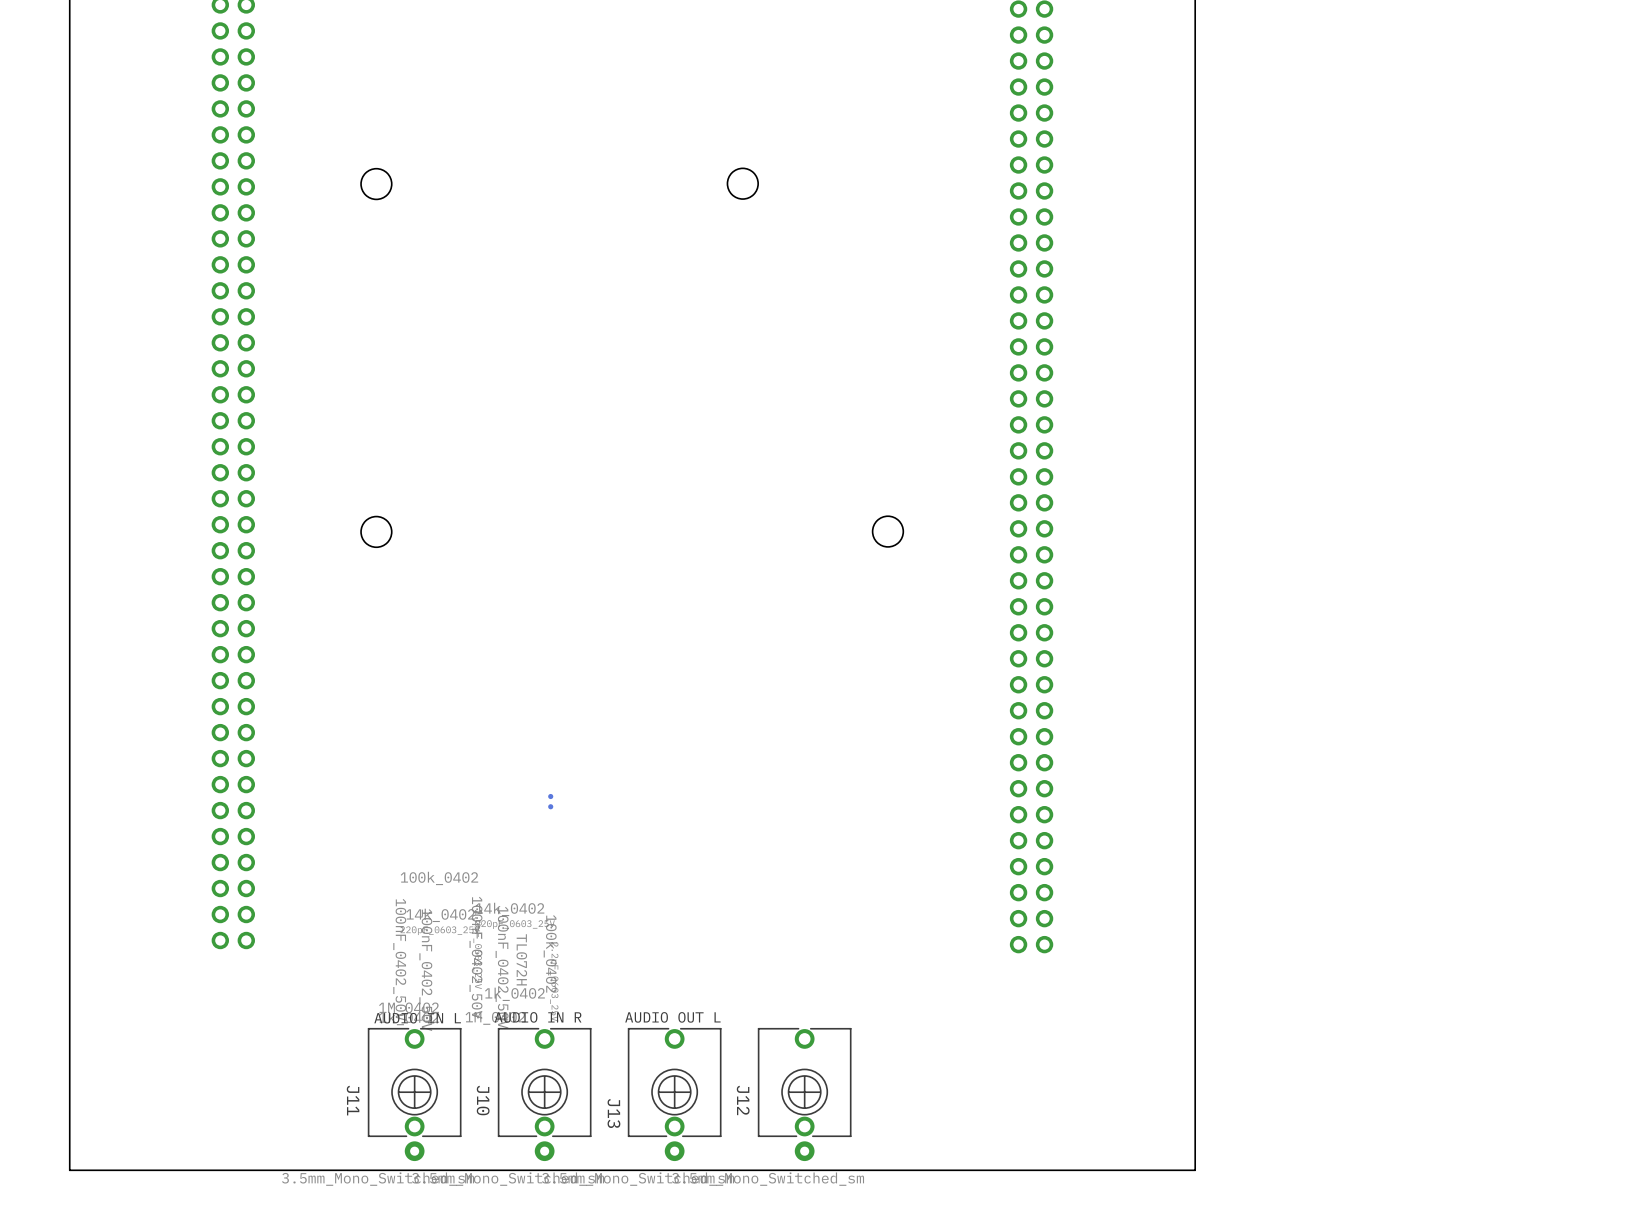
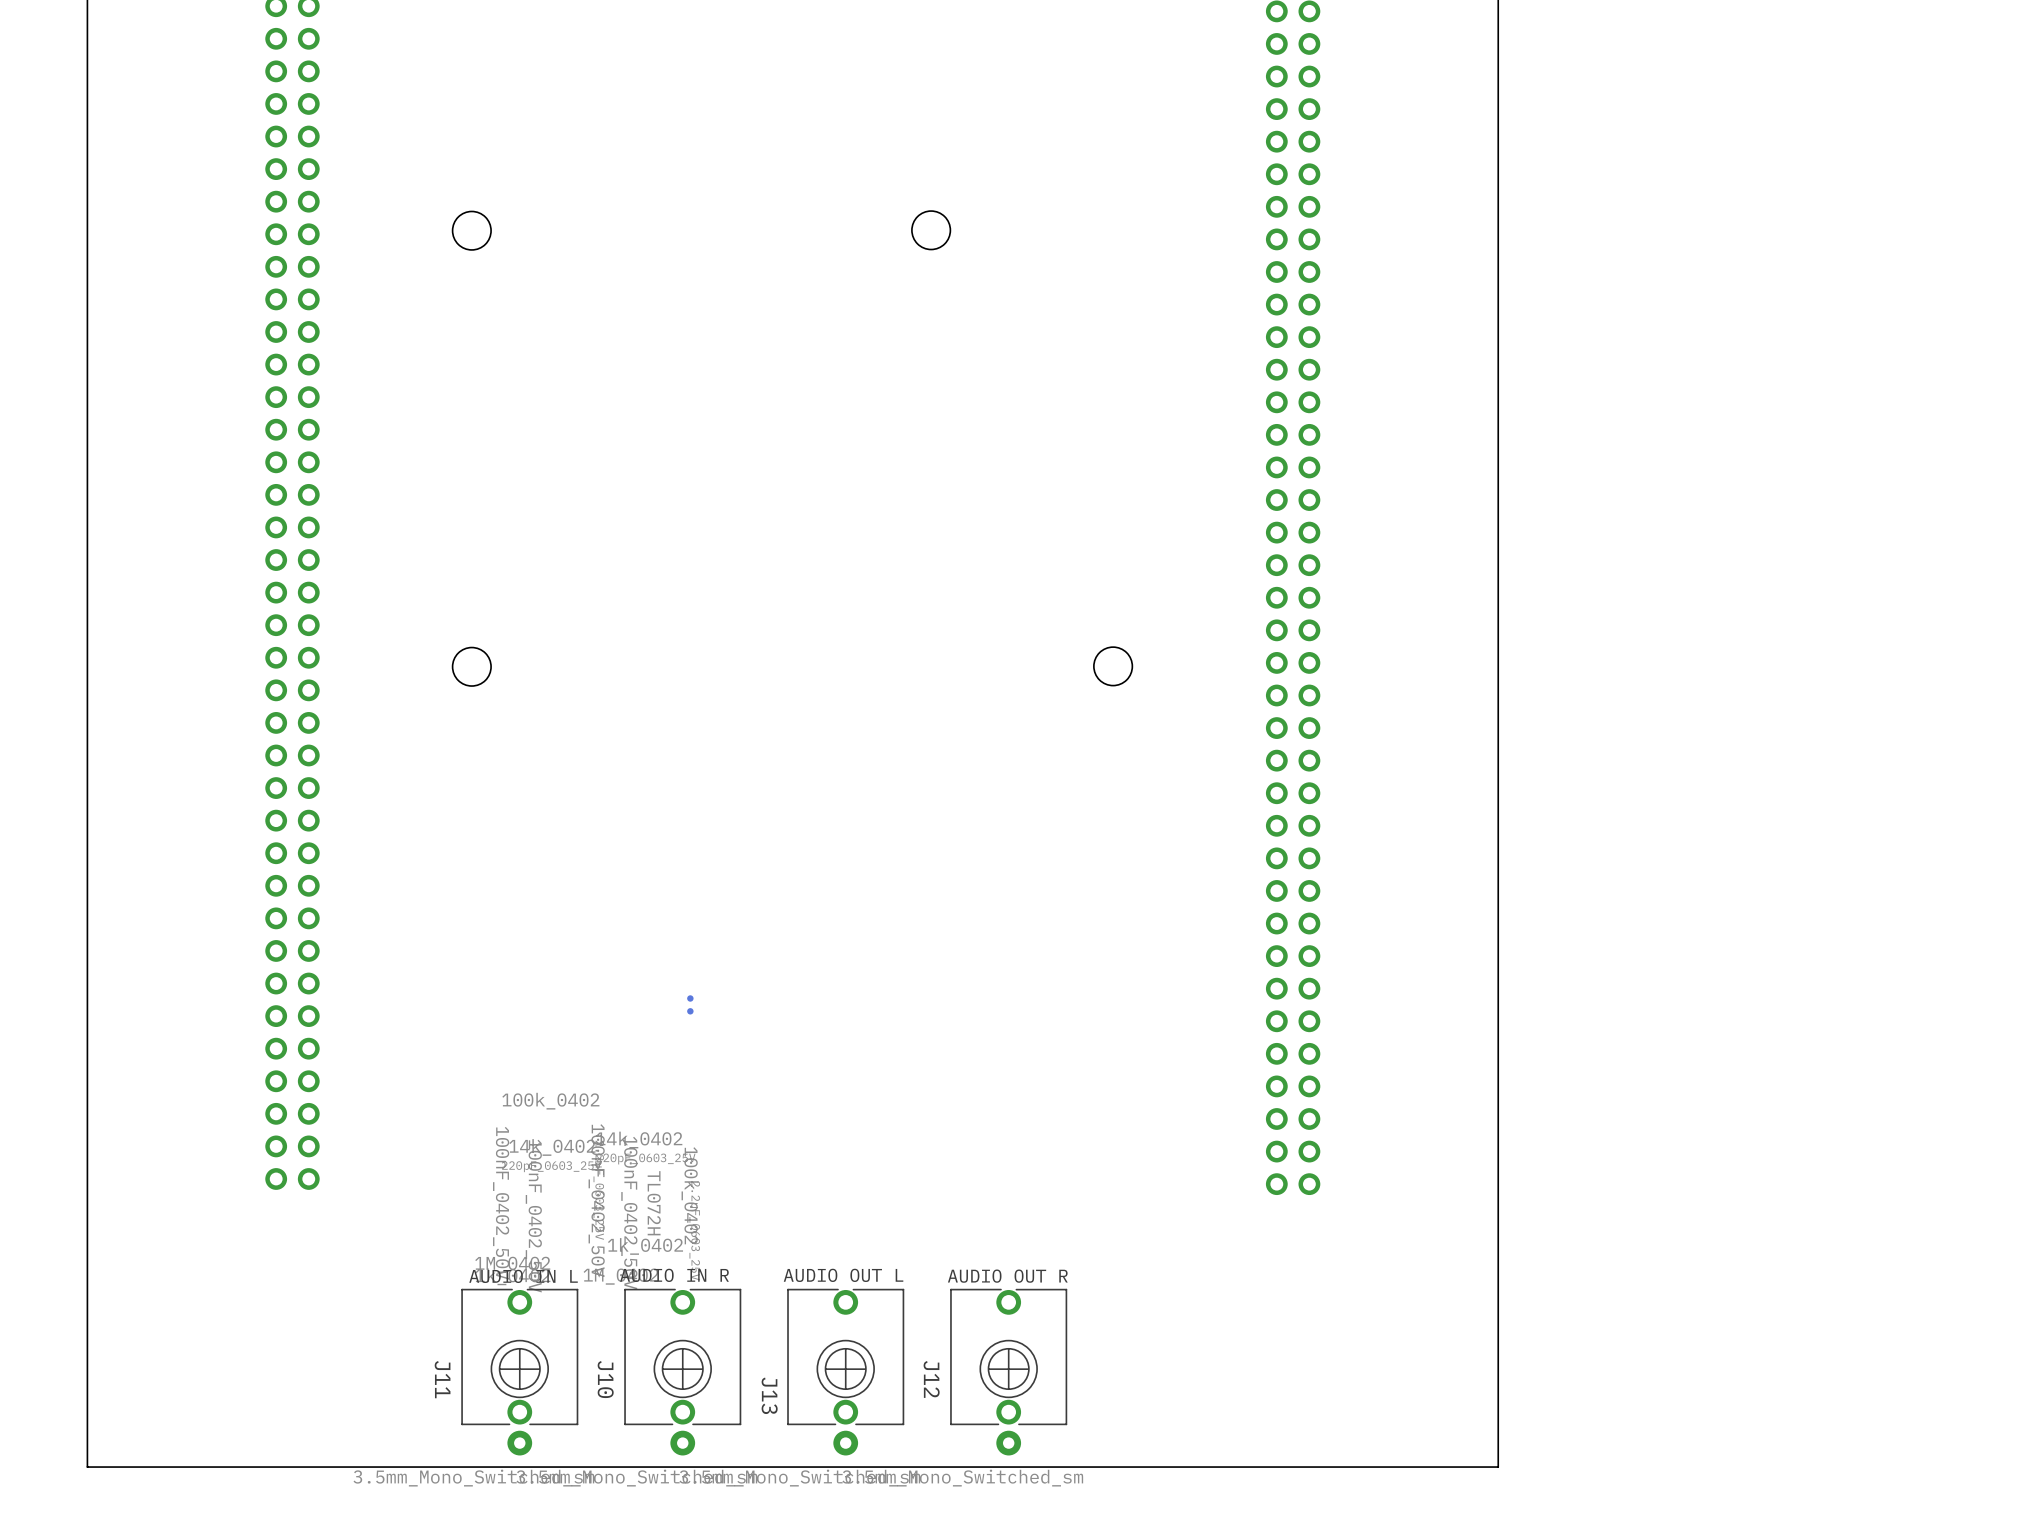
text: none -> AUDIO OUT R (1007, 1276)

